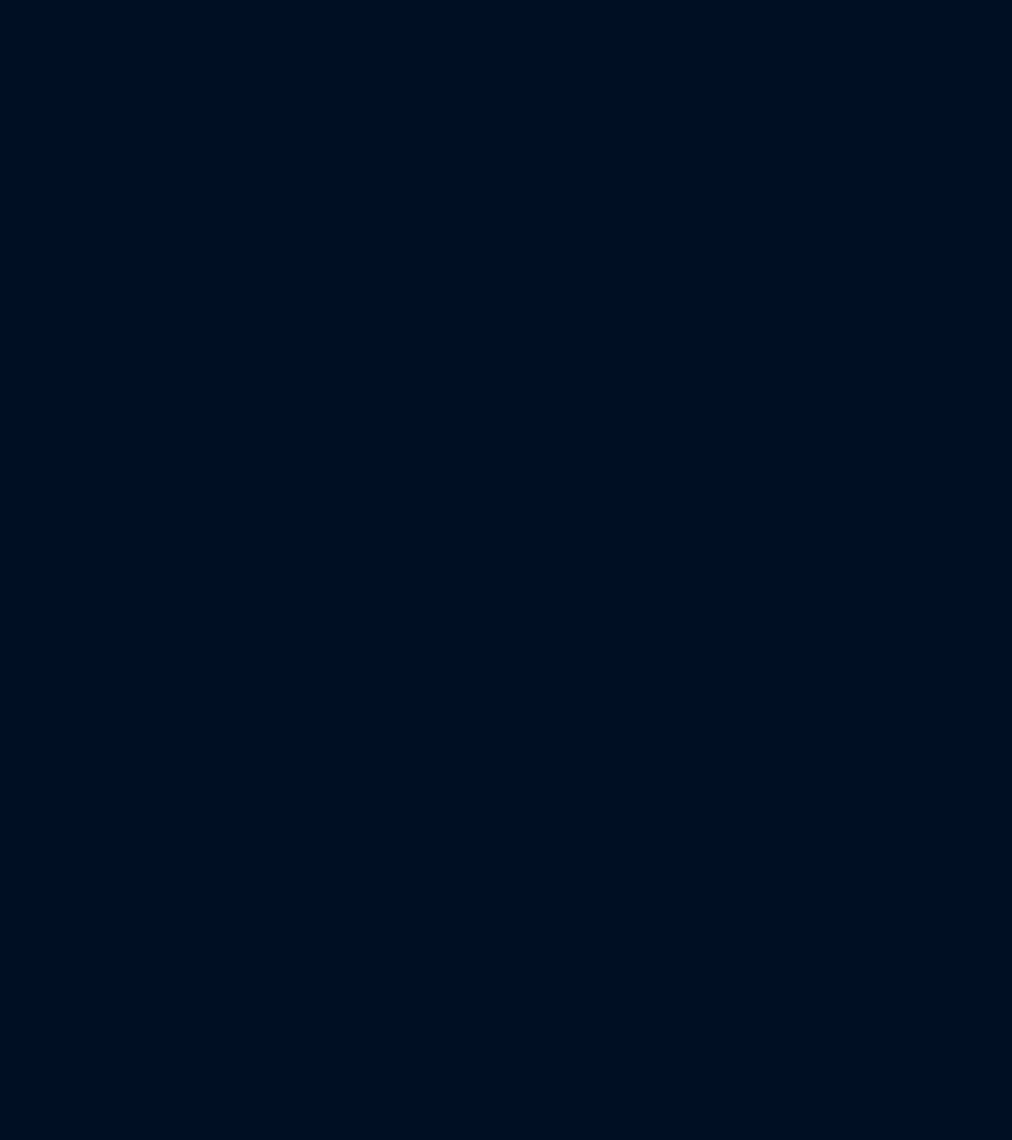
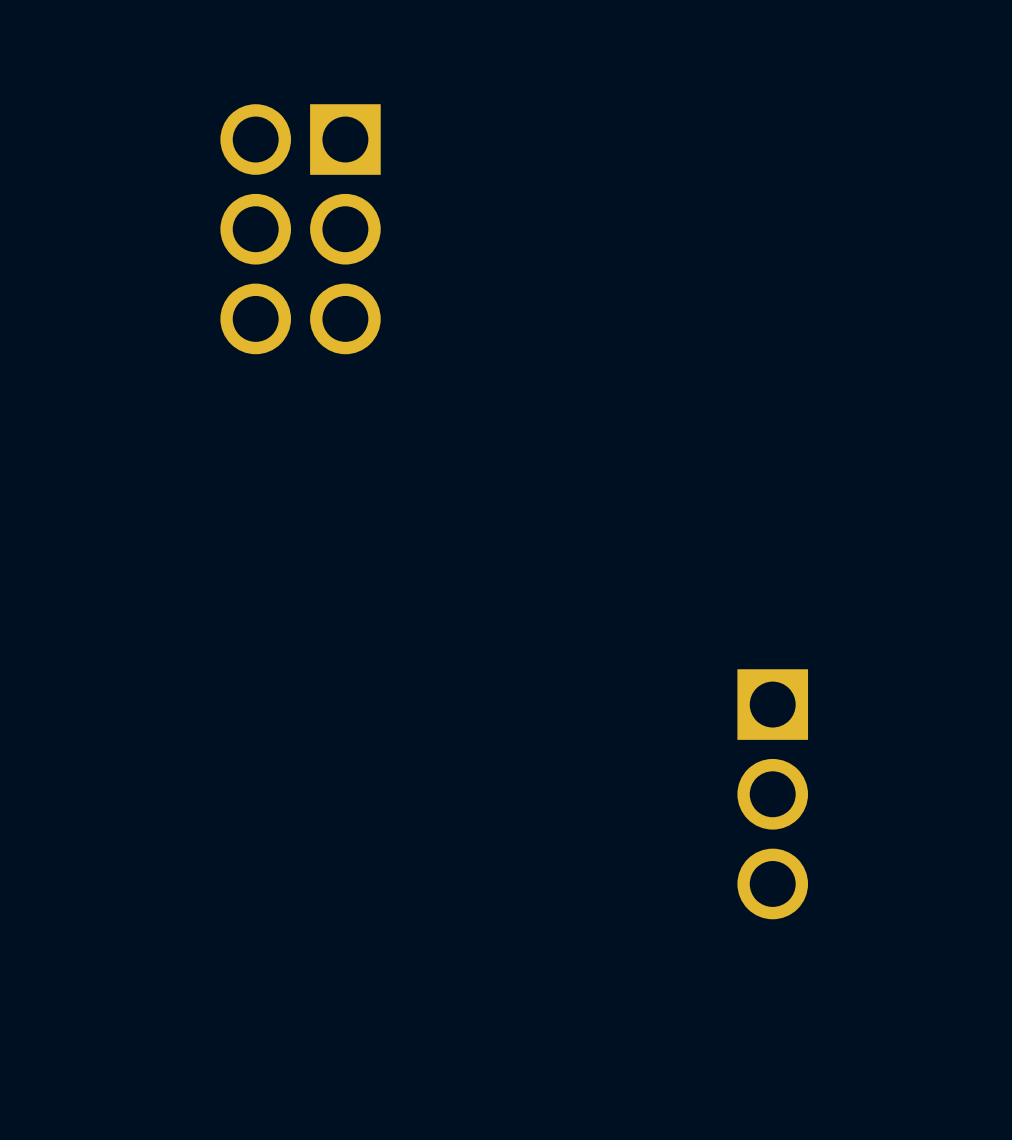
part: none -> (300, 229)
part: none -> (772, 794)

